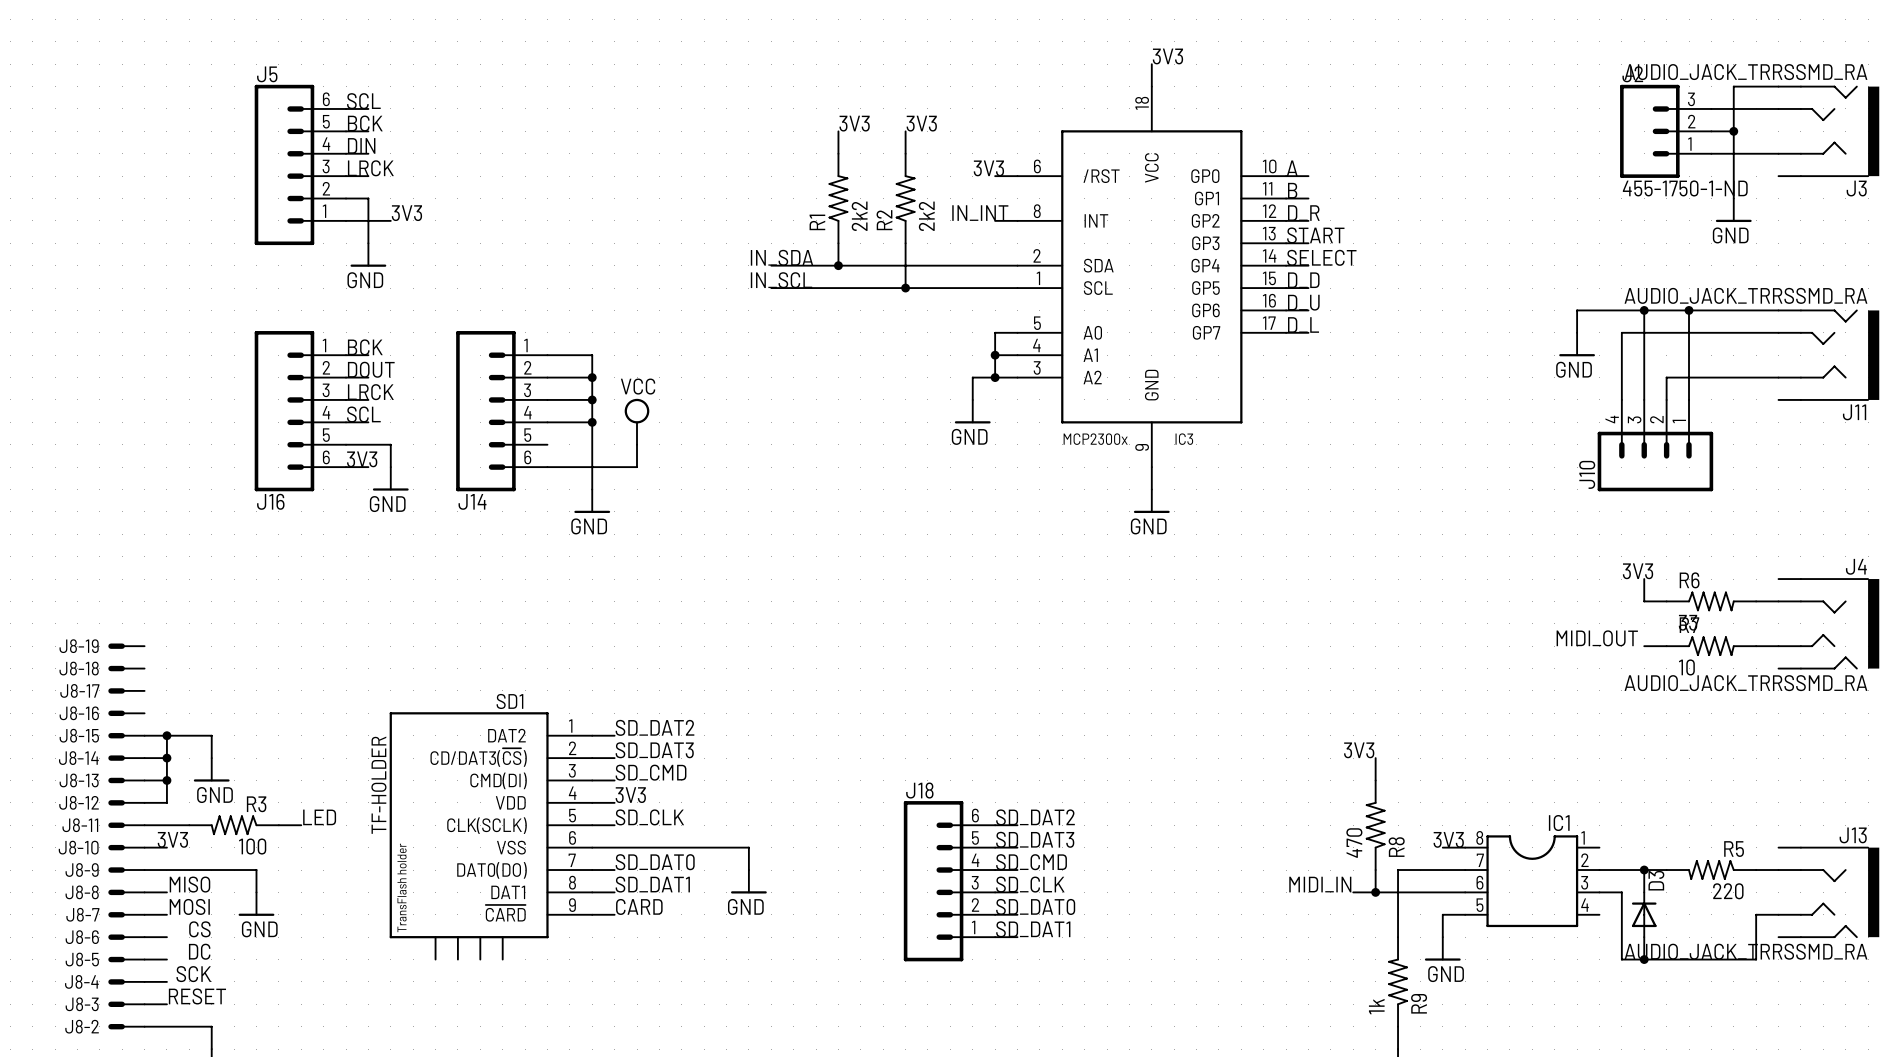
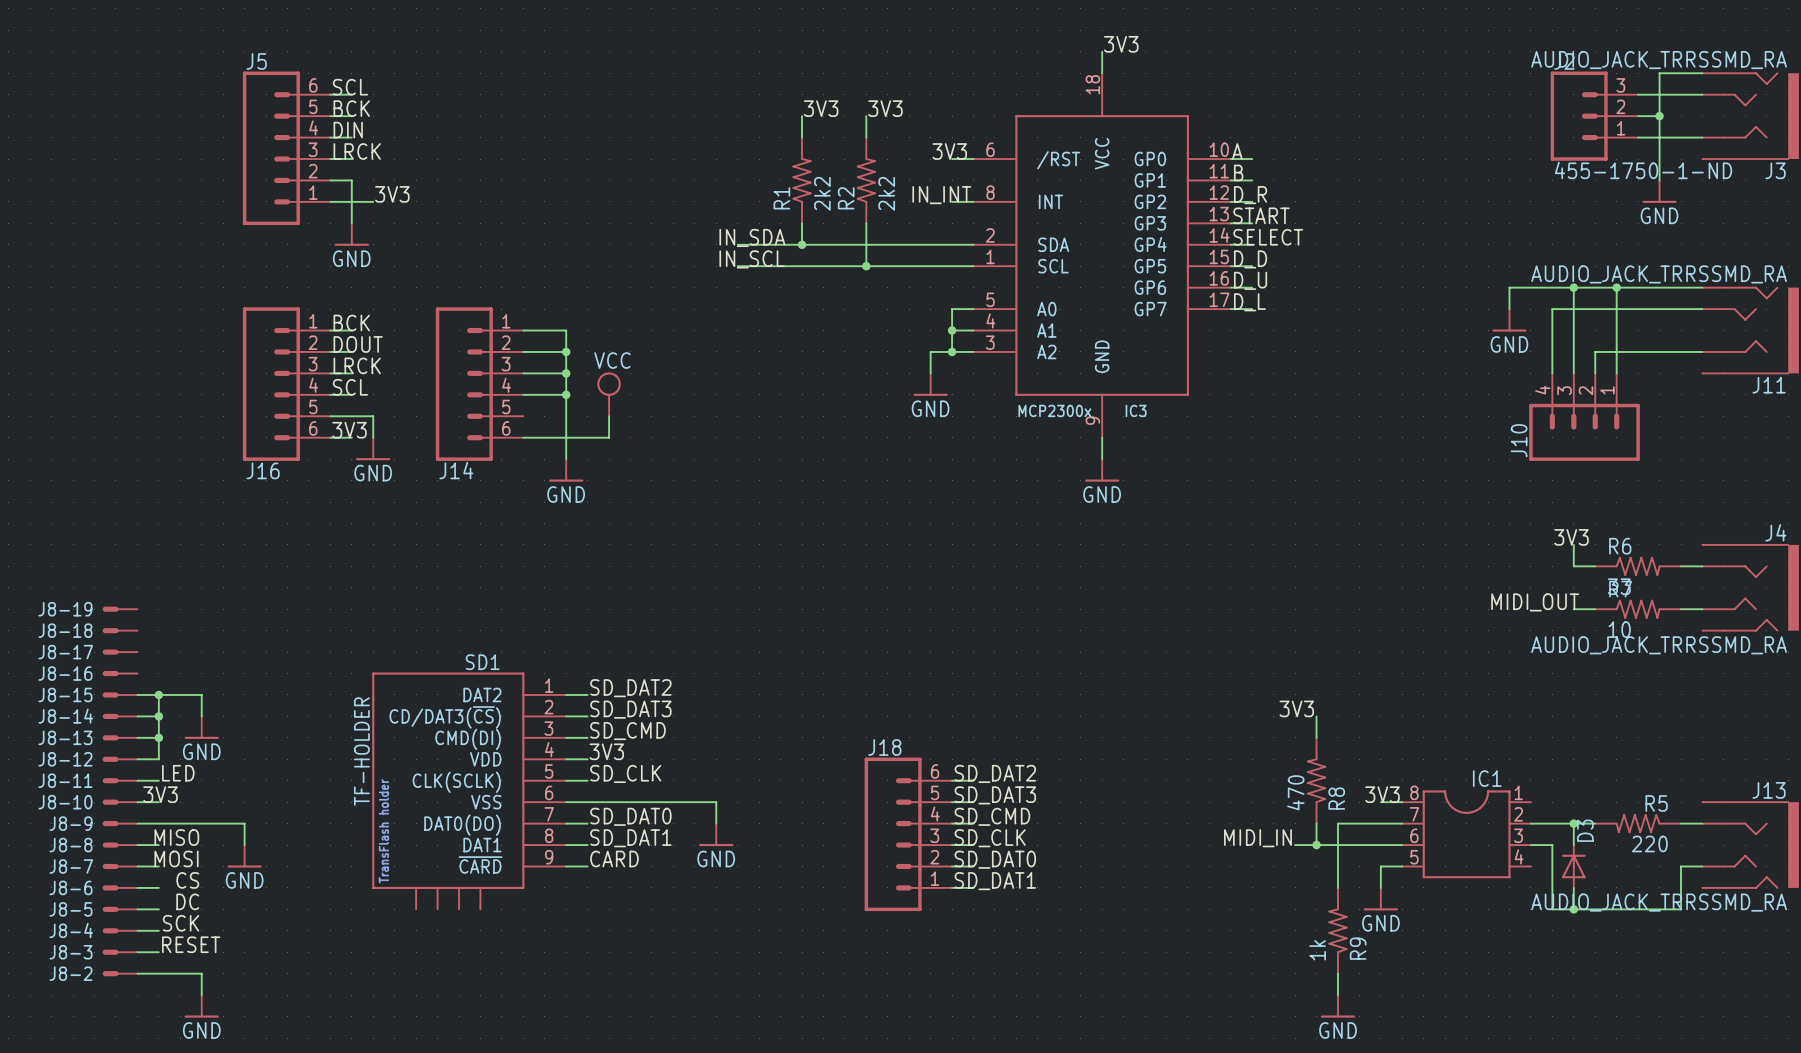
label position: LED (319, 817) -> LED (178, 773)
wire: (166, 825) (189, 825) -> none
R3: 100 (234, 825) -> none
wire: (278, 825) (301, 825) -> none

